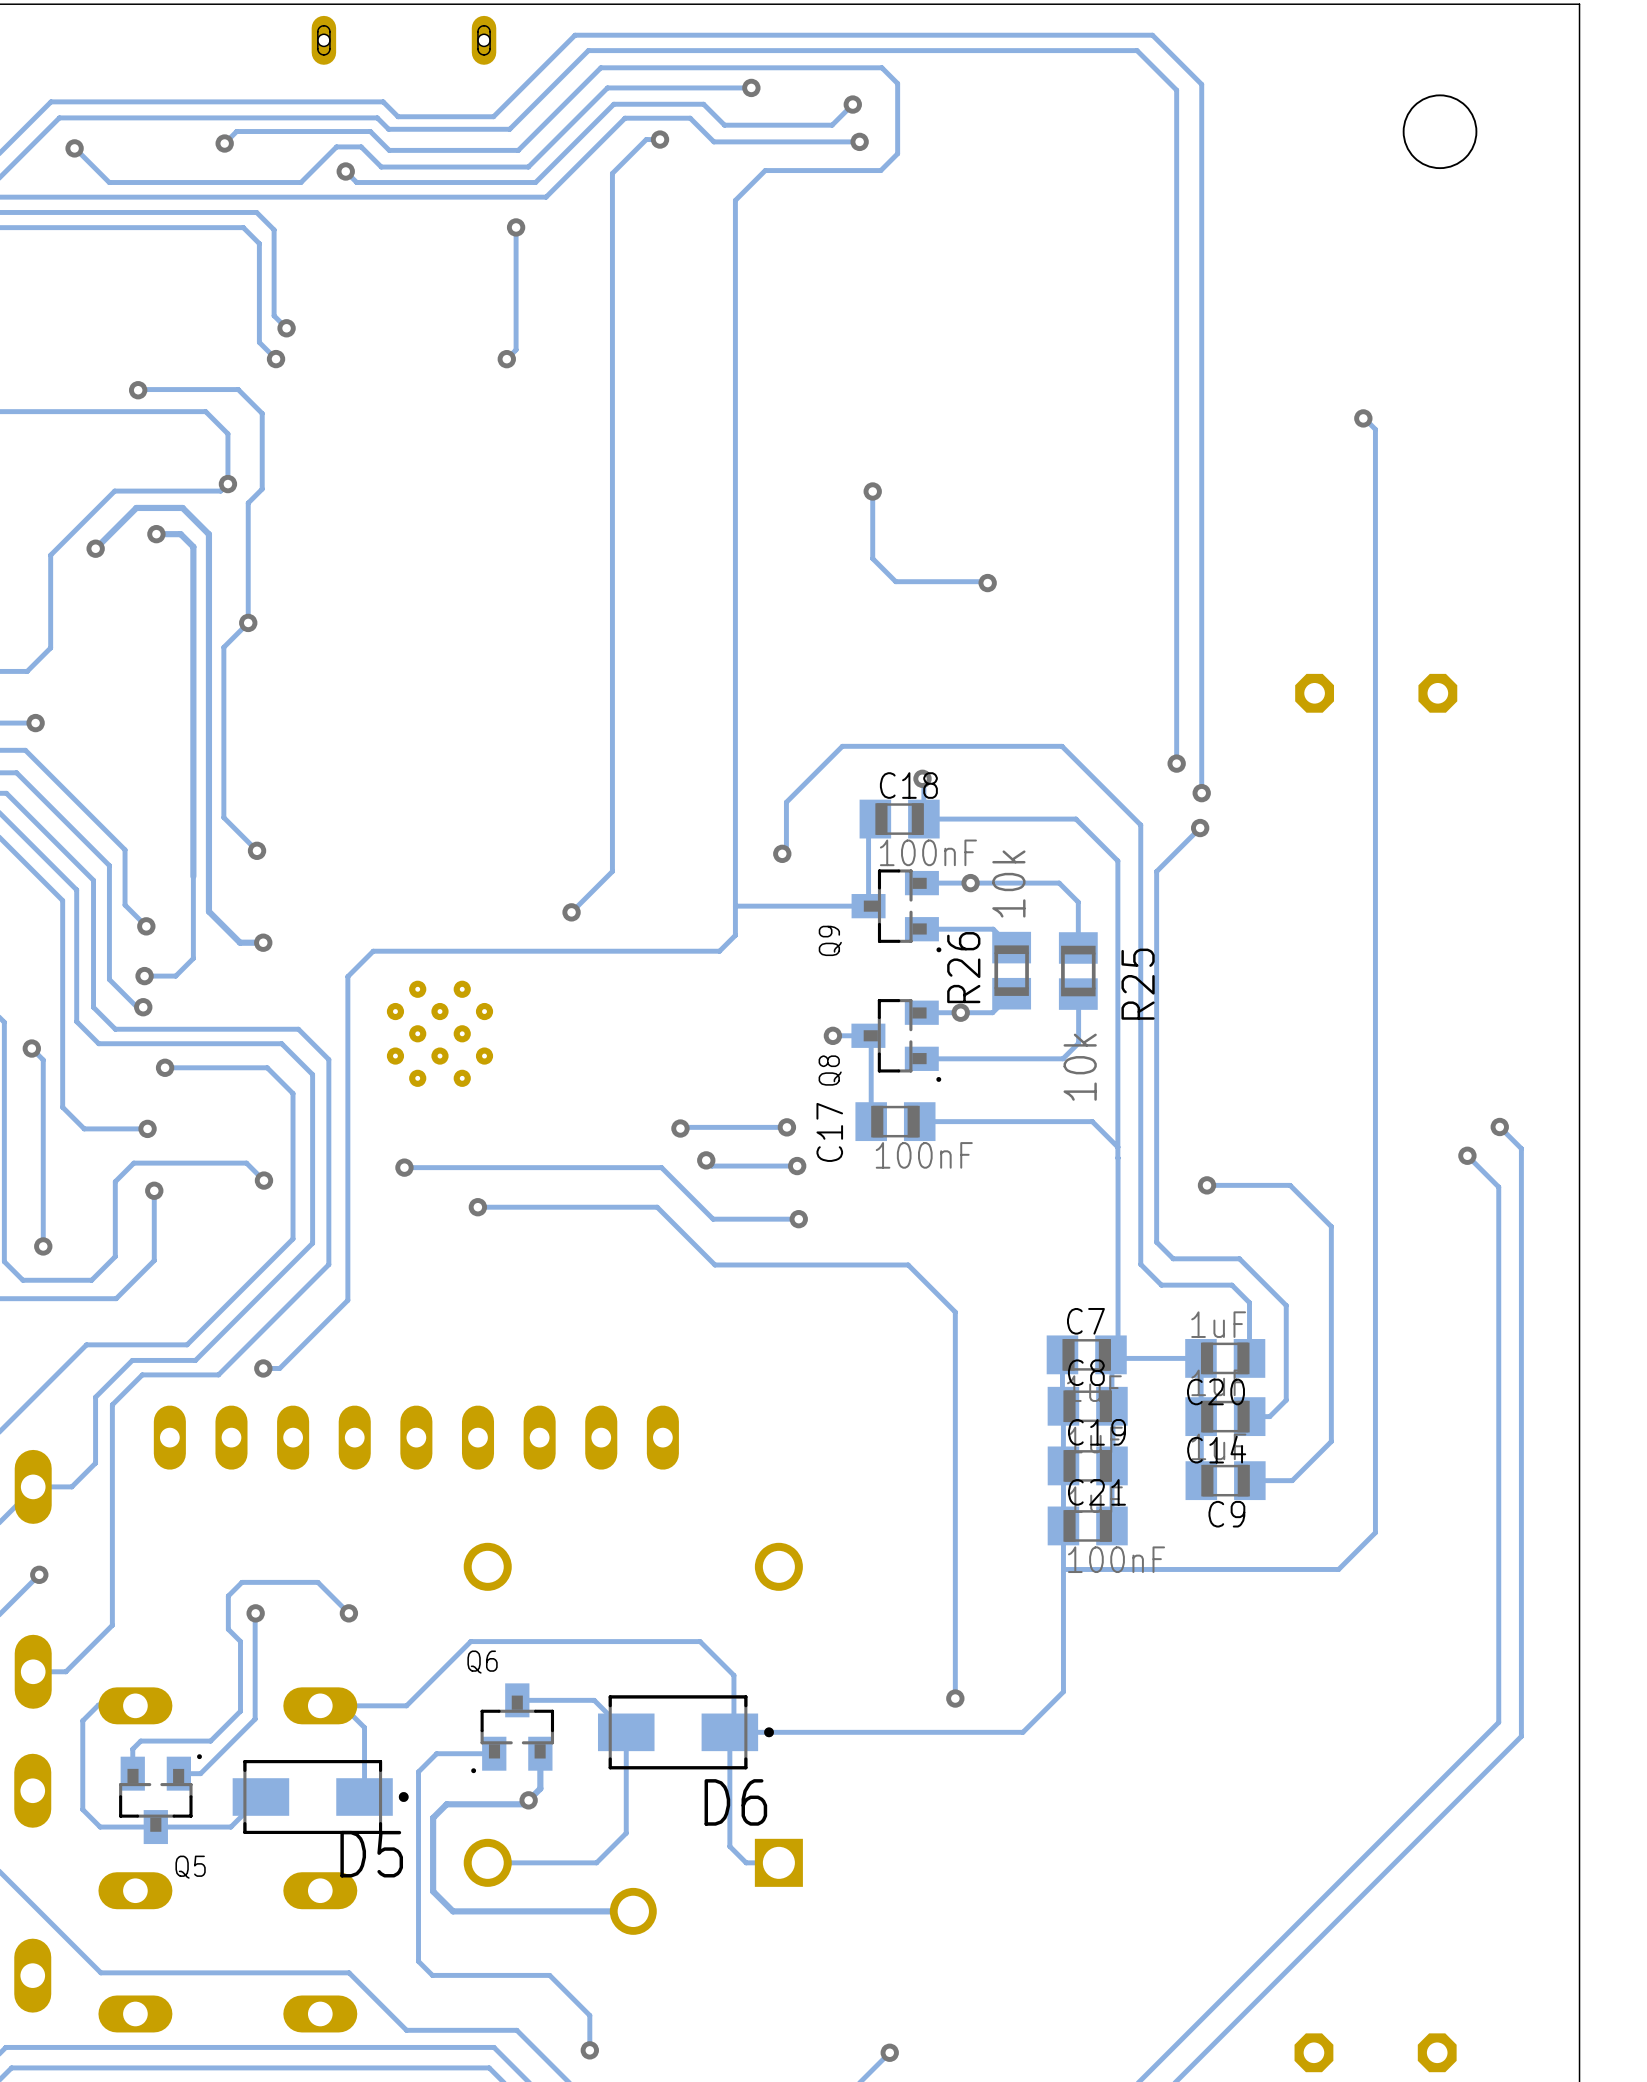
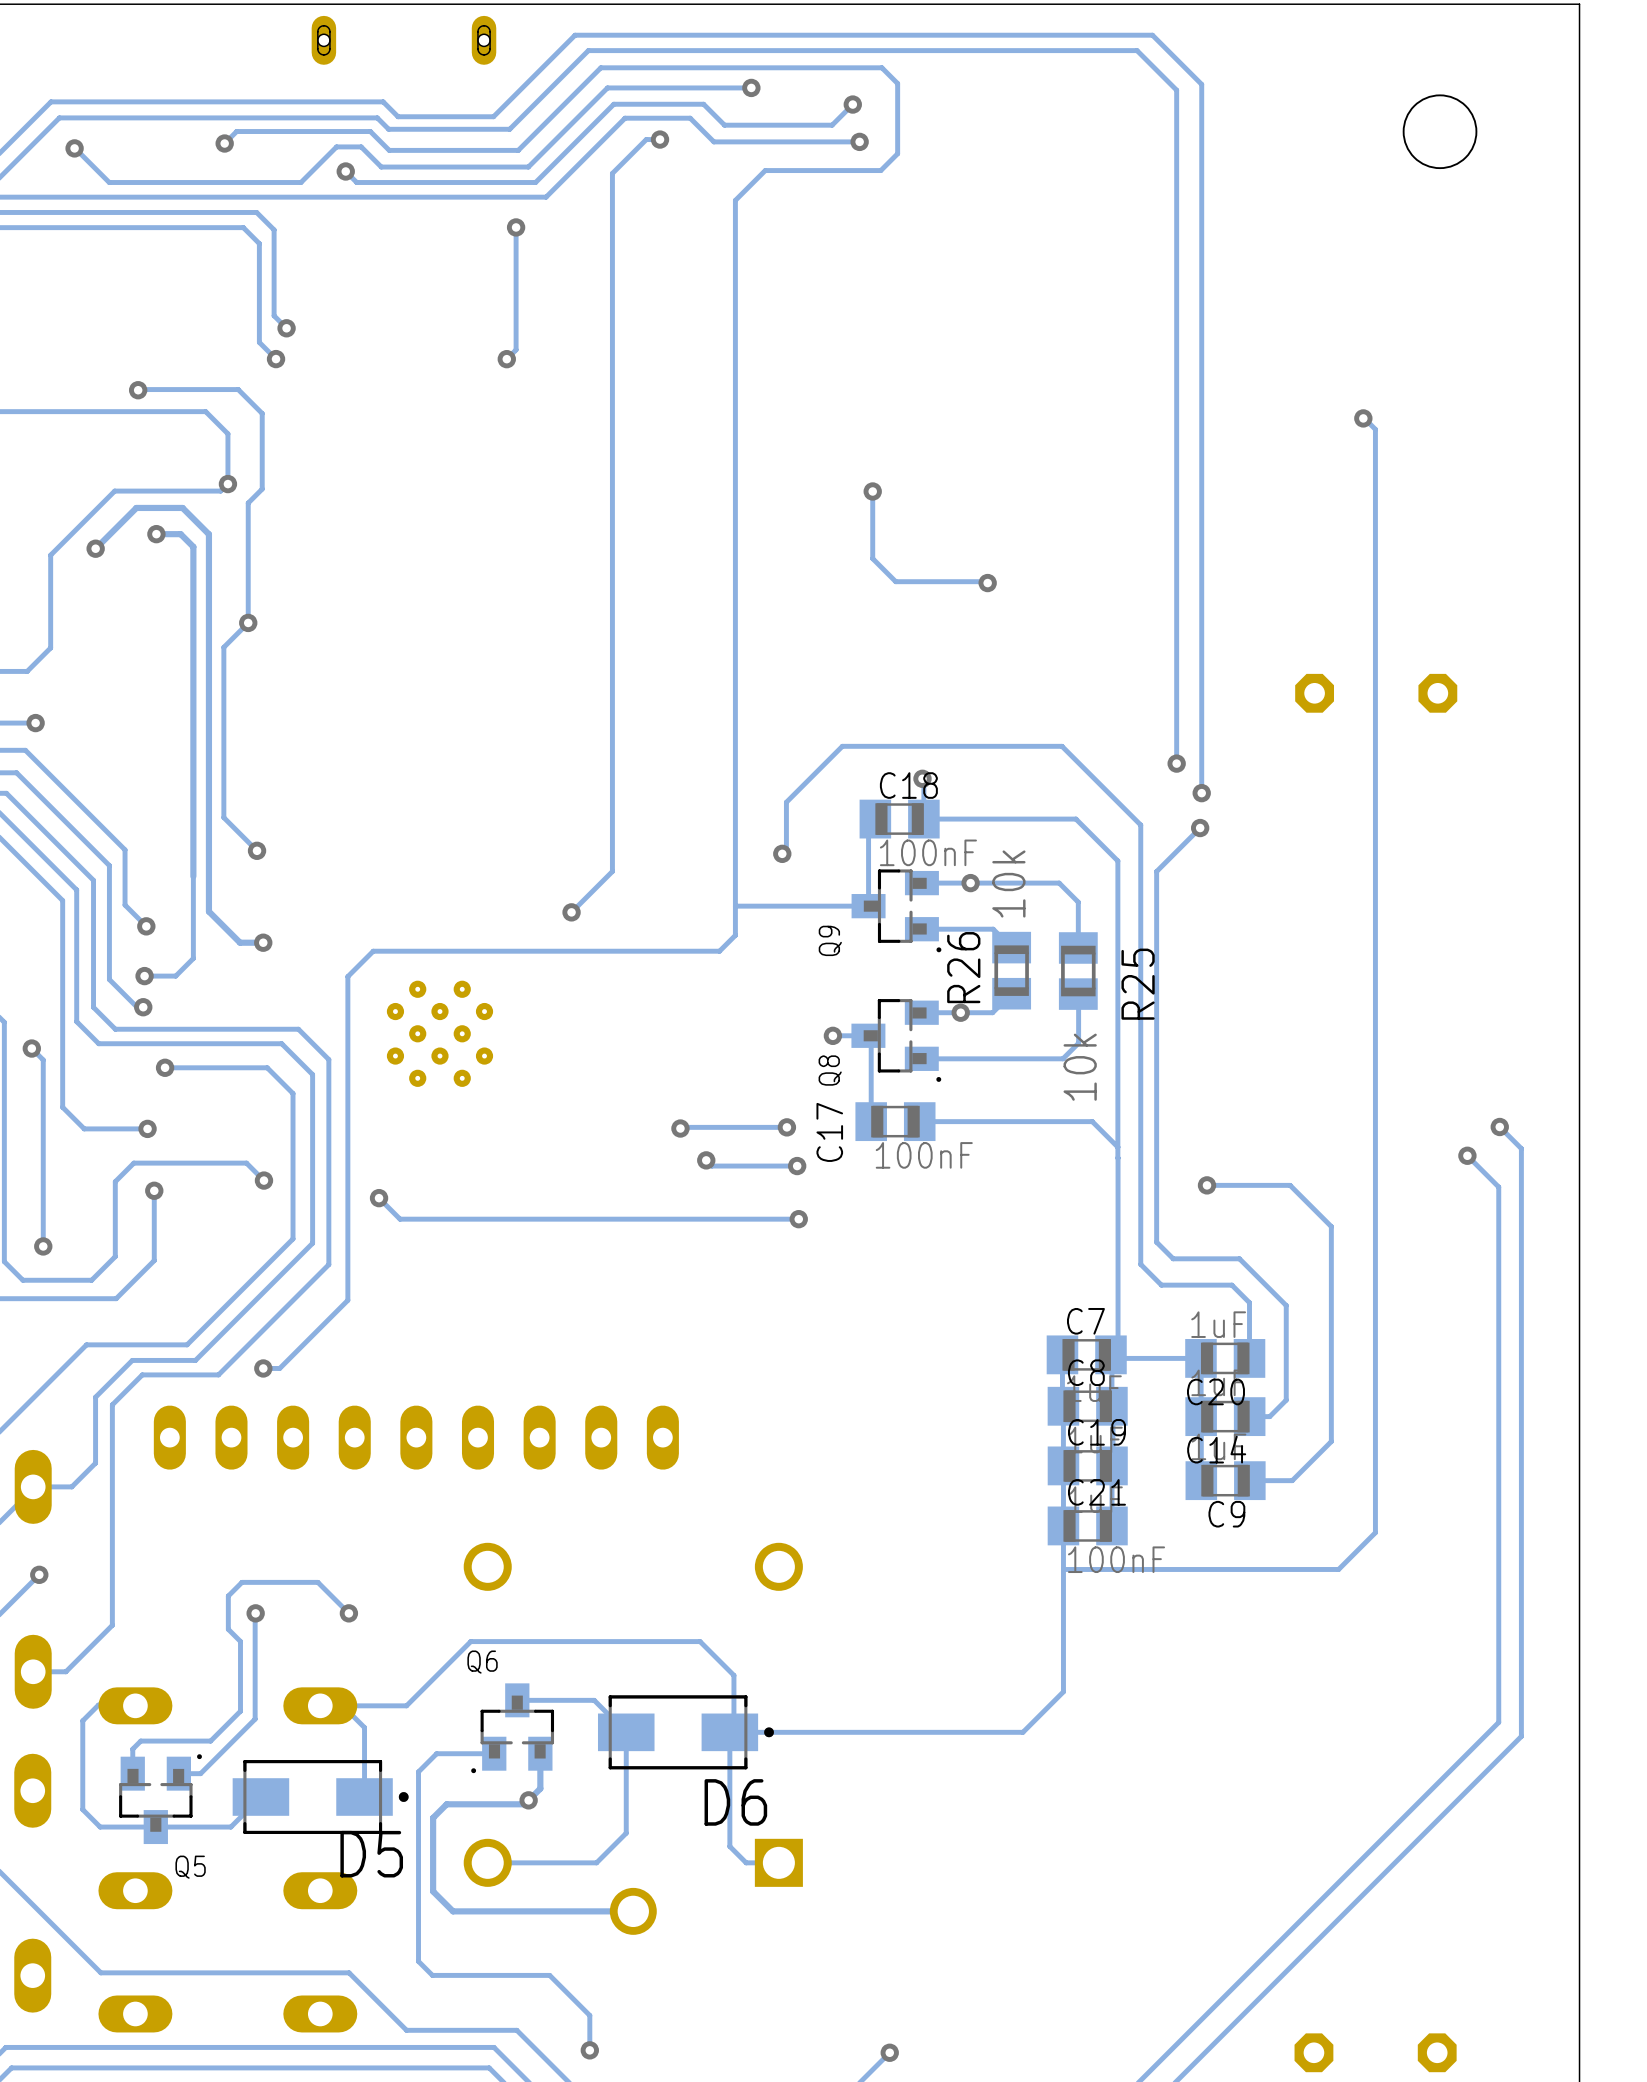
track: (404, 1167) (661, 1167) (713, 1219) -> (379, 1198) (400, 1219) (713, 1219)
via position: (404, 1167) -> (379, 1198)
track: (477, 1207) (657, 1207) (714, 1264) (908, 1264) (955, 1312) (955, 1698) -> none
via: (477, 1207) -> none
via: (955, 1698) -> none

